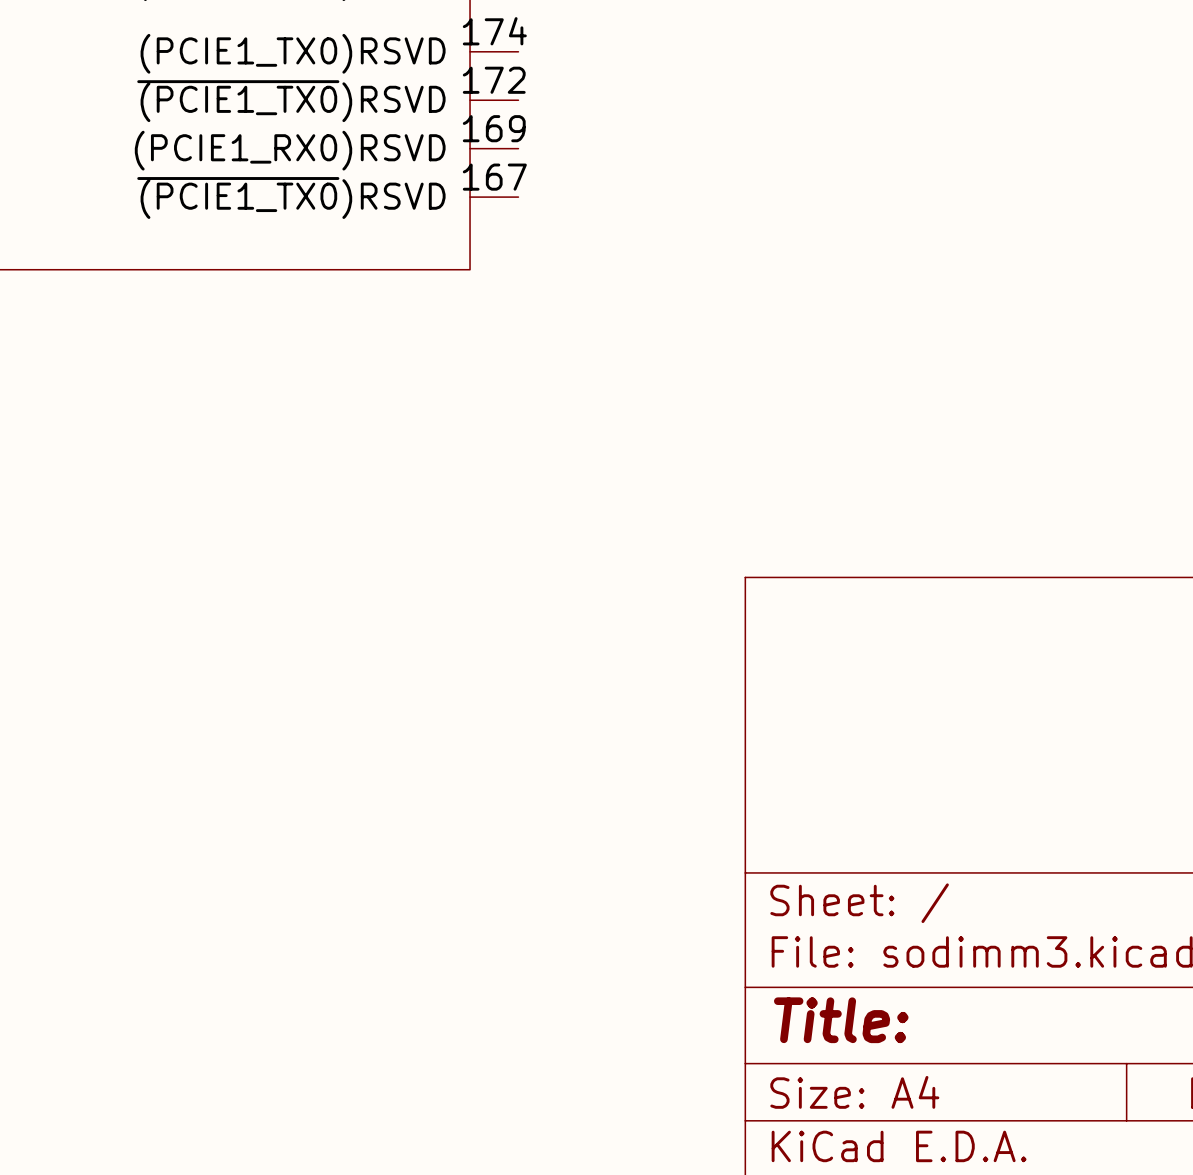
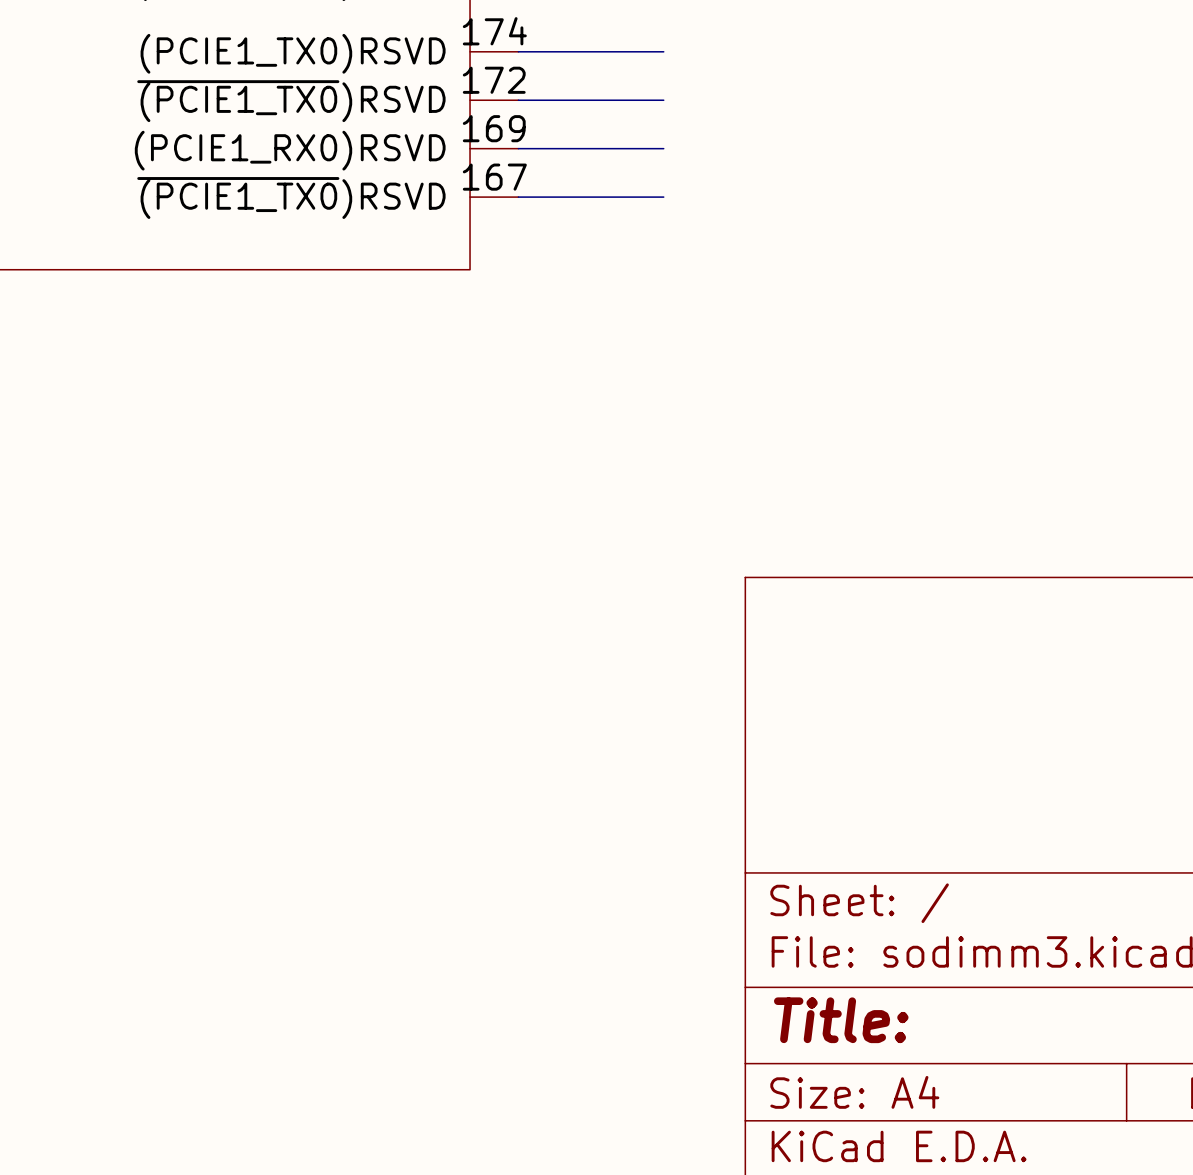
wire: none -> (518, 51) (663, 51)
wire: none -> (518, 100) (663, 100)
wire: none -> (518, 148) (663, 148)
wire: none -> (518, 197) (663, 197)

